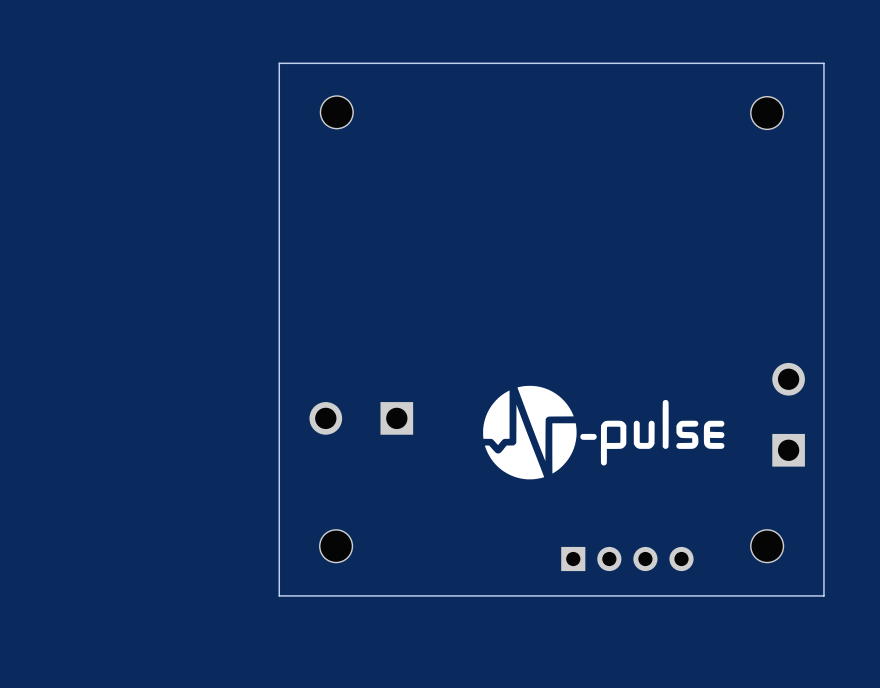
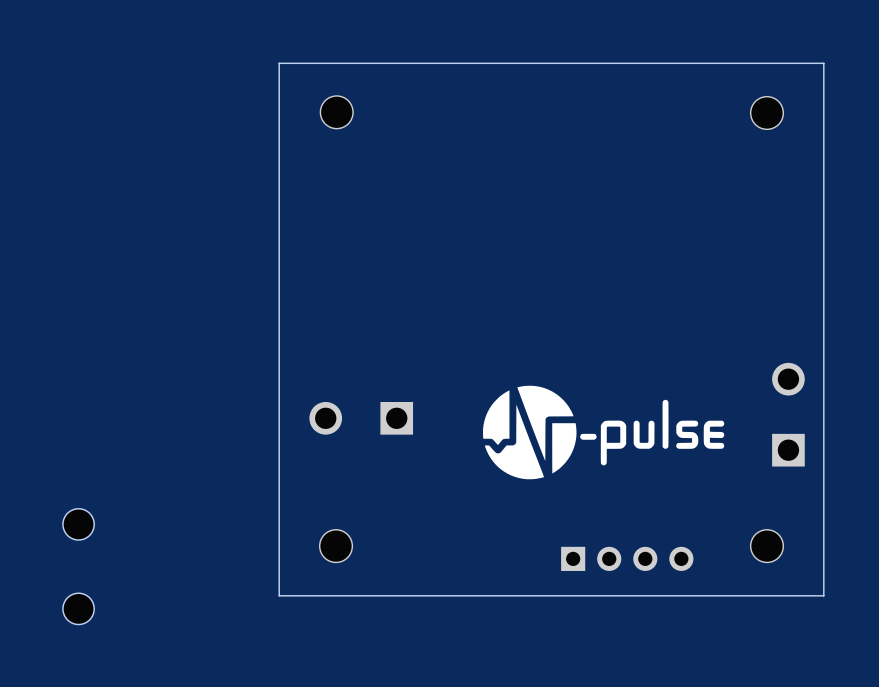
part: none -> (78, 524)
part: none -> (78, 608)

